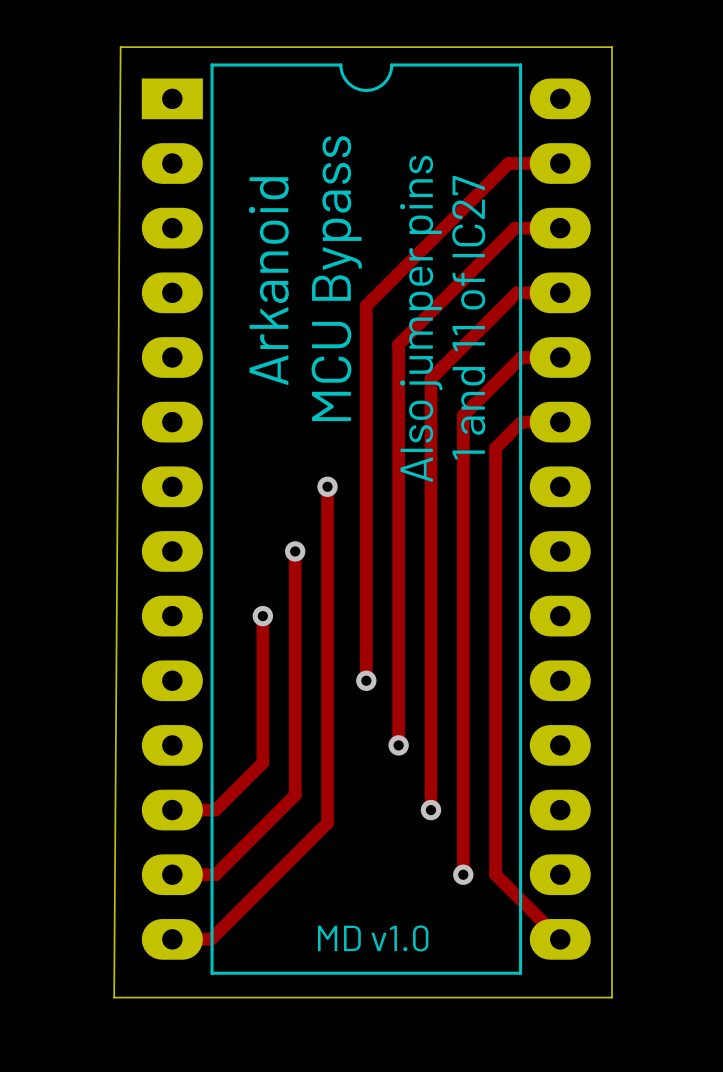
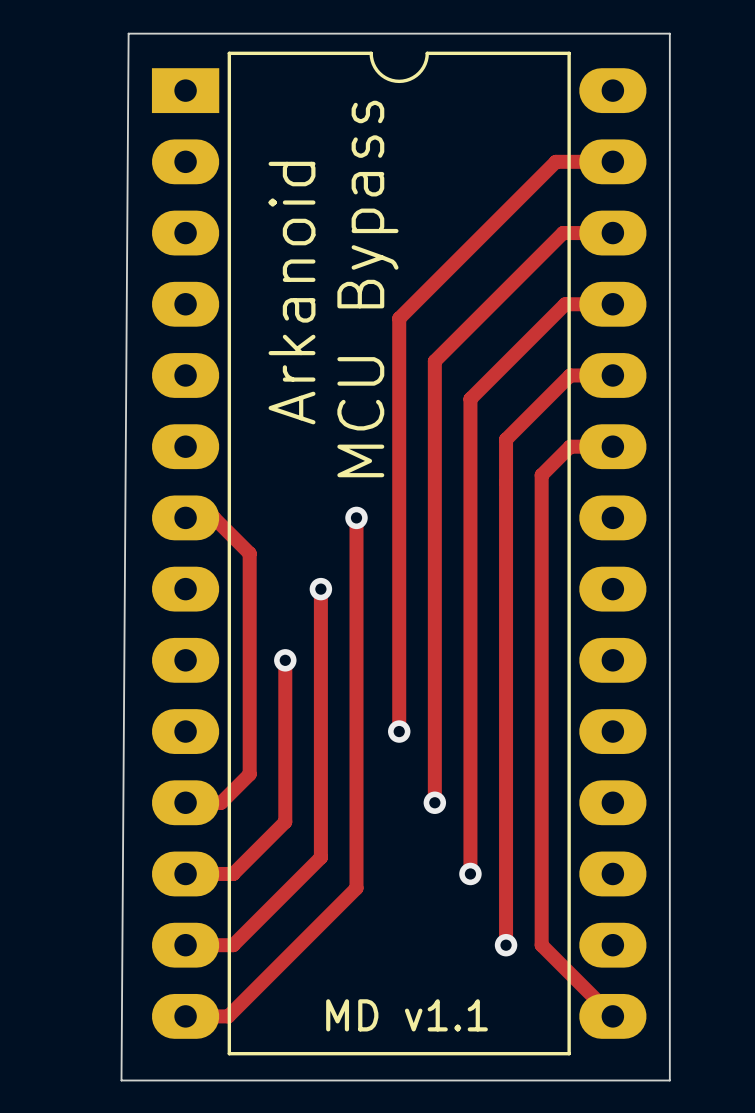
text: 1 and 11 of IC27 (468, 317) -> none
text: Also jumper pins (421, 319) -> none
track: none -> (185, 517) (214, 517) (249, 553) (249, 774) (221, 802) (185, 802)
text: MD v1.0 (373, 938) -> MD v1.1 (407, 1015)

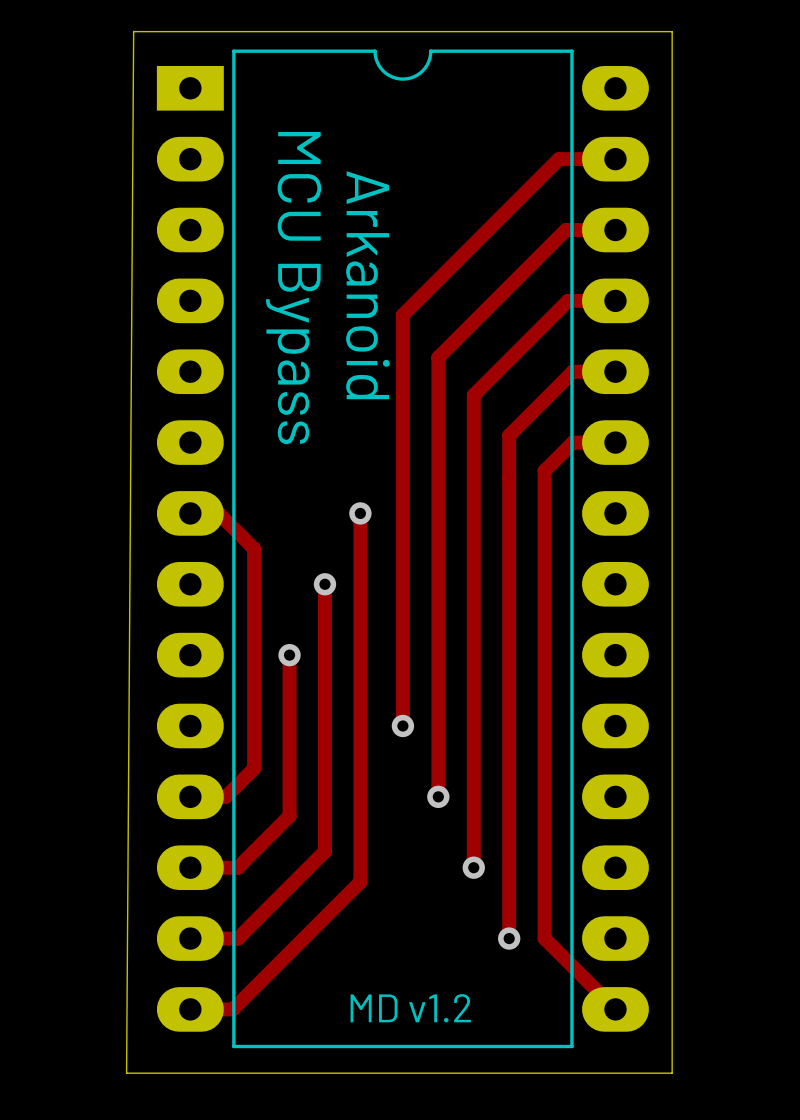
text: MCU Bypass (367, 289) -> Arkanoid (367, 285)
text: Arkanoid (292, 293) -> MCU Bypass (293, 288)
text: MD v1.1 (407, 1015) -> MD v1.2 (410, 1008)

